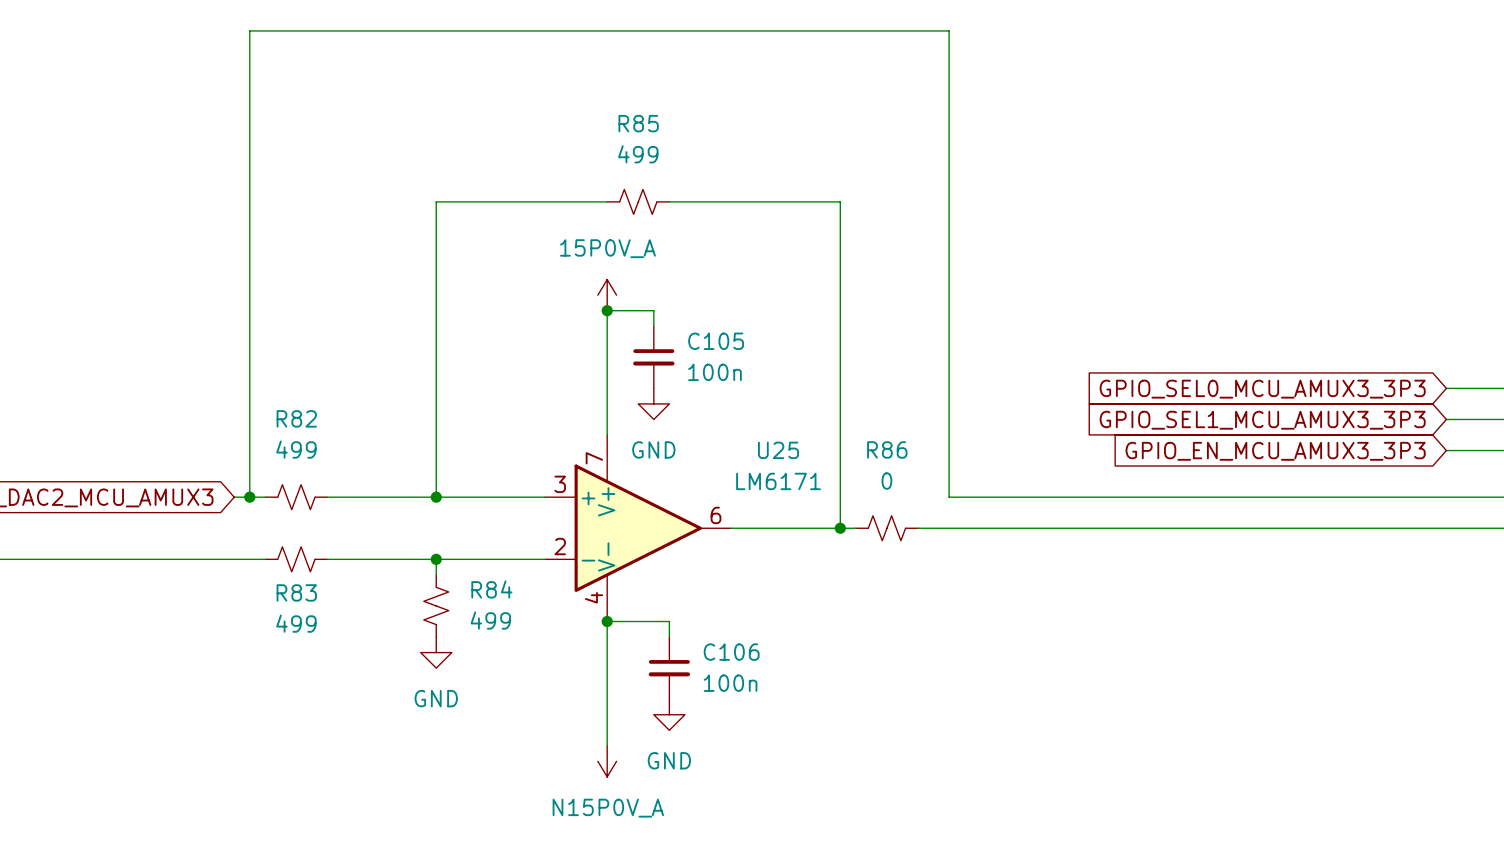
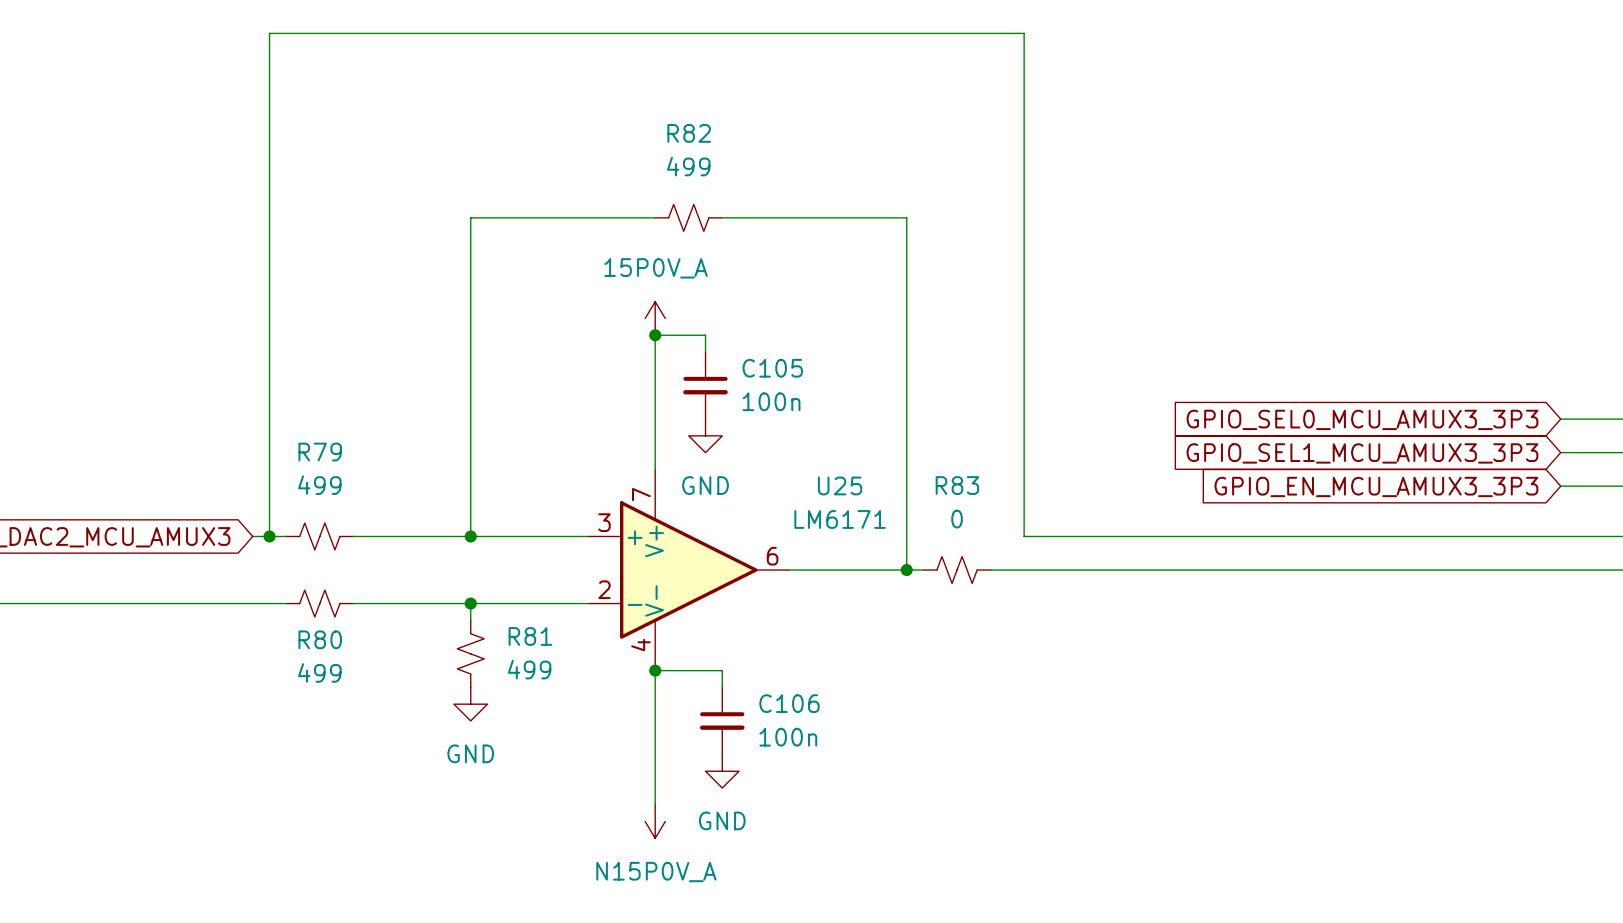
R85 name: R85 (638, 123) -> R82 (689, 133)
R82 name: R82 (296, 418) -> R79 (320, 452)
R86 name: R86 (887, 449) -> R83 (957, 485)
R84 name: R84 (491, 589) -> R81 (530, 636)
R83 name: R83 (296, 592) -> R80 (320, 639)

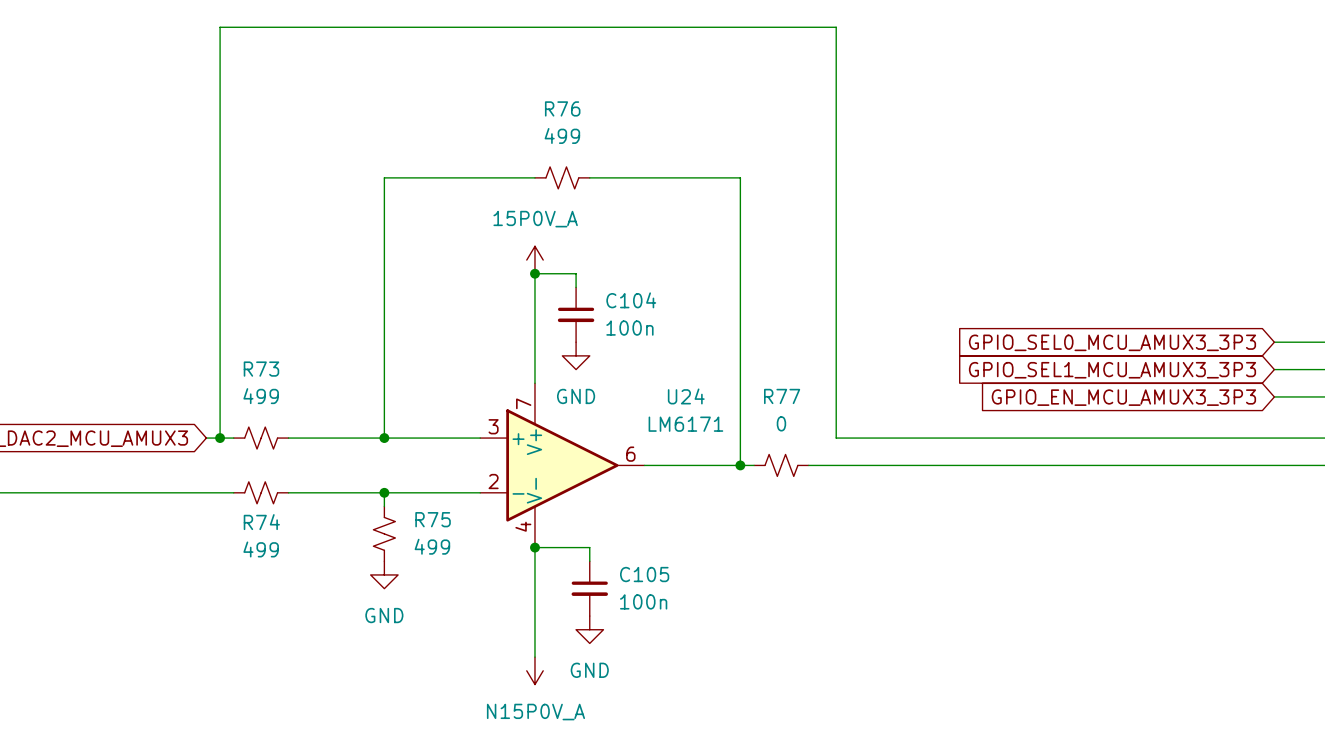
R82 name: R82 (689, 133) -> R76 (562, 108)
C105 name: C105 (772, 368) -> C104 (631, 300)
R79 name: R79 (320, 452) -> R73 (261, 369)
U25 name: U25 (840, 485) -> U24 (686, 396)
R83 name: R83 (957, 485) -> R77 (782, 396)
R81 name: R81 (530, 636) -> R75 (433, 519)
R80 name: R80 (320, 639) -> R74 (261, 522)
C106 name: C106 (789, 703) -> C105 (644, 574)

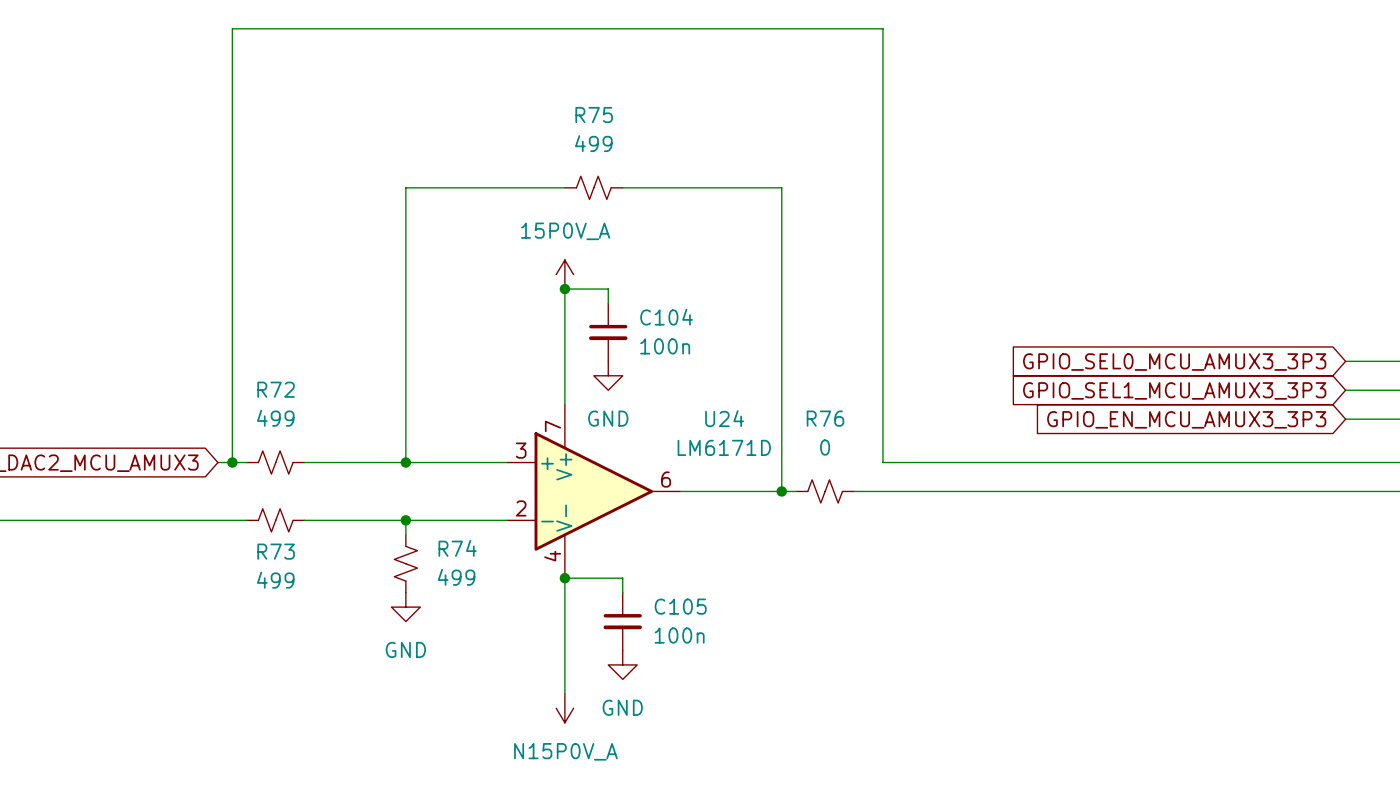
R76 name: R76 (562, 108) -> R75 (594, 115)
R73 name: R73 (261, 369) -> R72 (276, 389)
R77 name: R77 (782, 396) -> R76 (825, 418)
U24 value: LM6171 (685, 424) -> LM6171D (724, 447)
R75 name: R75 (433, 519) -> R74 (457, 548)
R74 name: R74 (261, 522) -> R73 (276, 551)

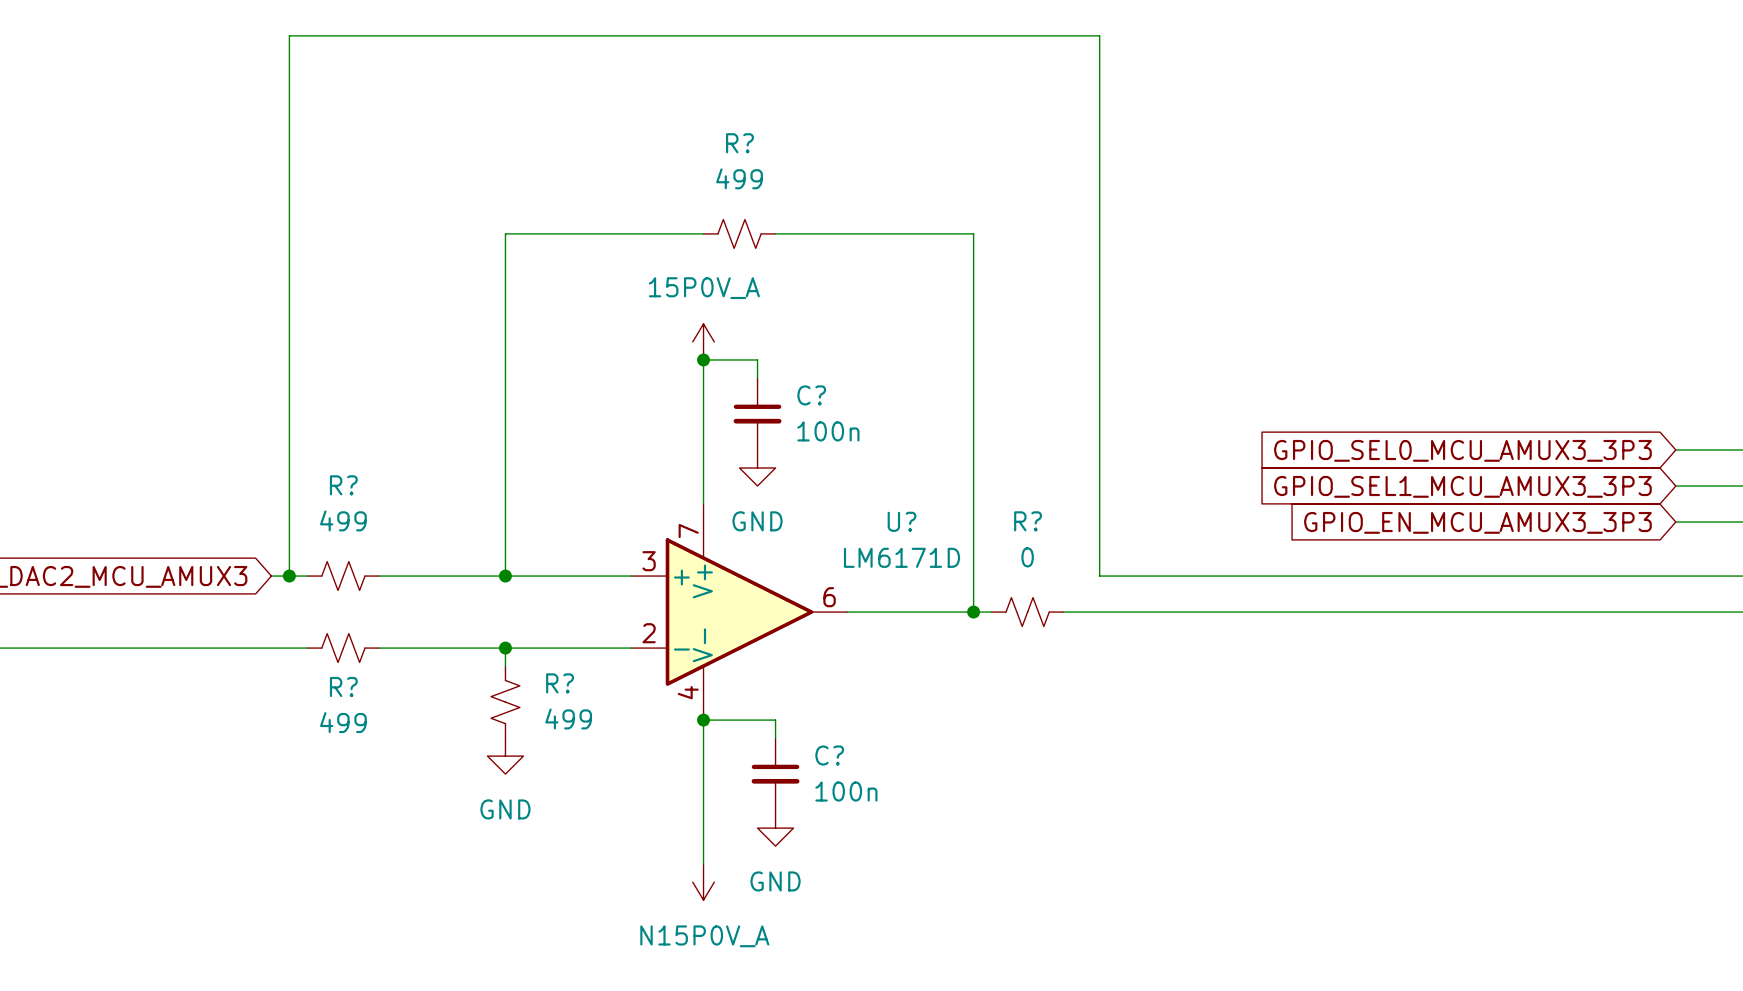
R75 name: R75 (594, 115) -> R? (739, 143)
C104 name: C104 (666, 317) -> C? (811, 395)
R72 name: R72 (276, 389) -> R? (343, 485)
U24 name: U24 (724, 418) -> U? (902, 521)
R76 name: R76 (825, 418) -> R? (1028, 521)
R74 name: R74 (457, 548) -> R? (560, 683)
R73 name: R73 (276, 551) -> R? (343, 687)
C105 name: C105 (680, 606) -> C? (829, 755)

